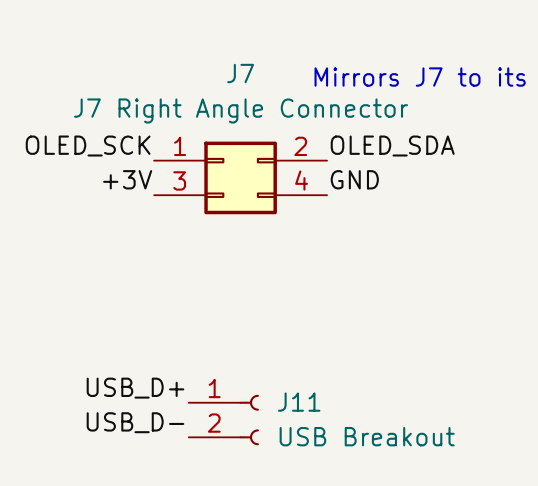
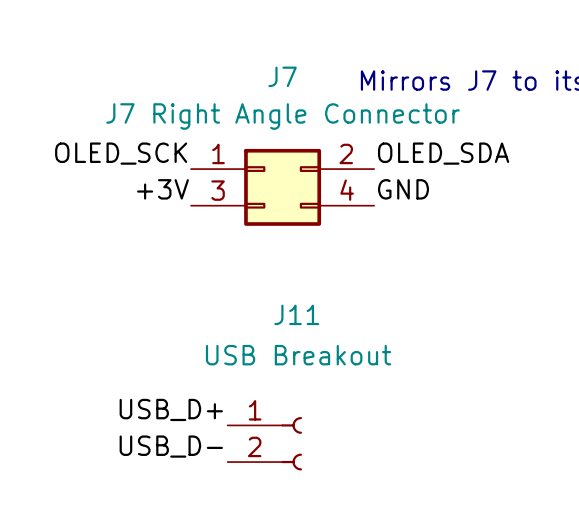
J11 name position: J11 (299, 402) -> J11 (296, 314)
J11 value position: USB Breakout (367, 436) -> USB Breakout (298, 355)

